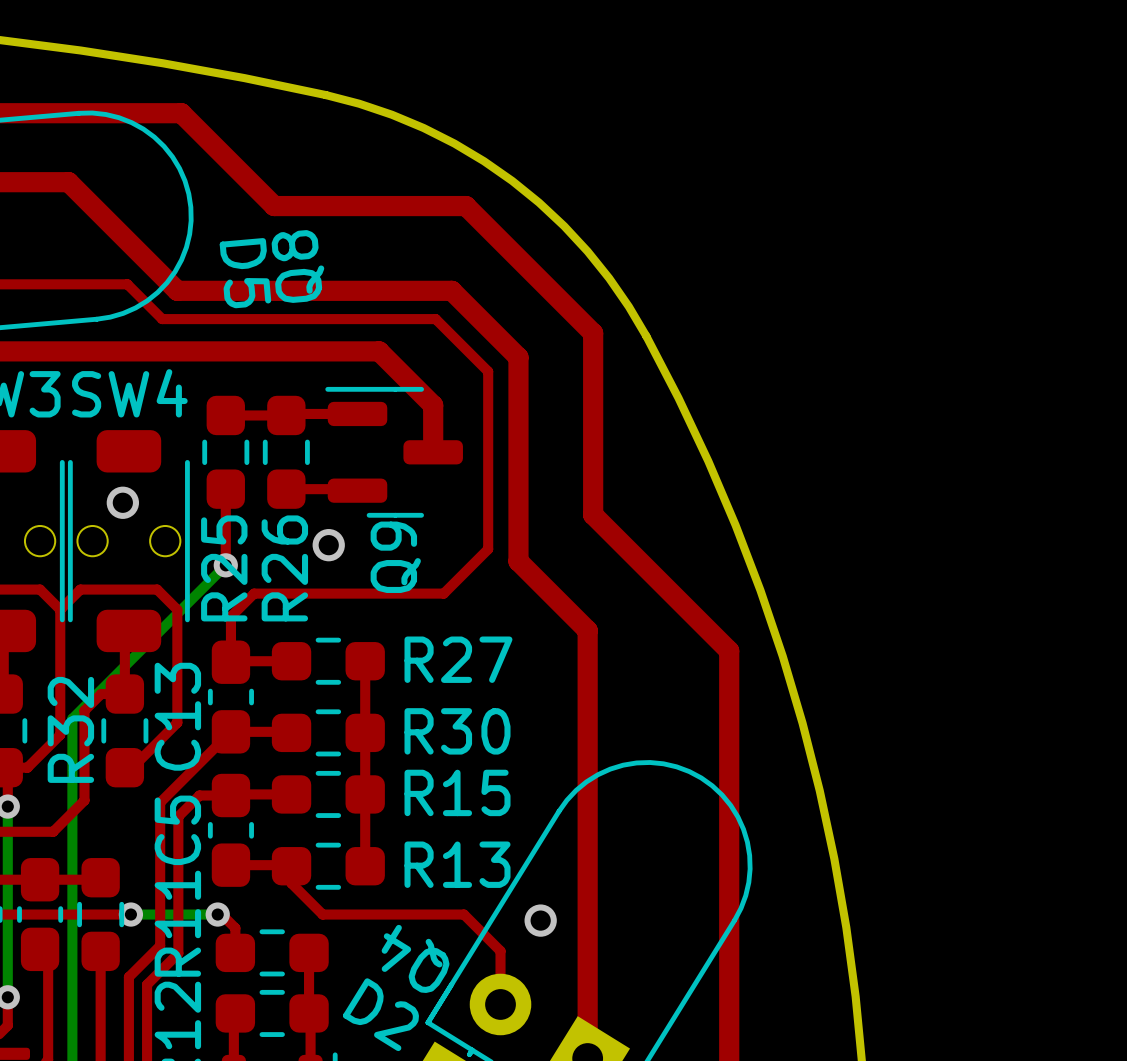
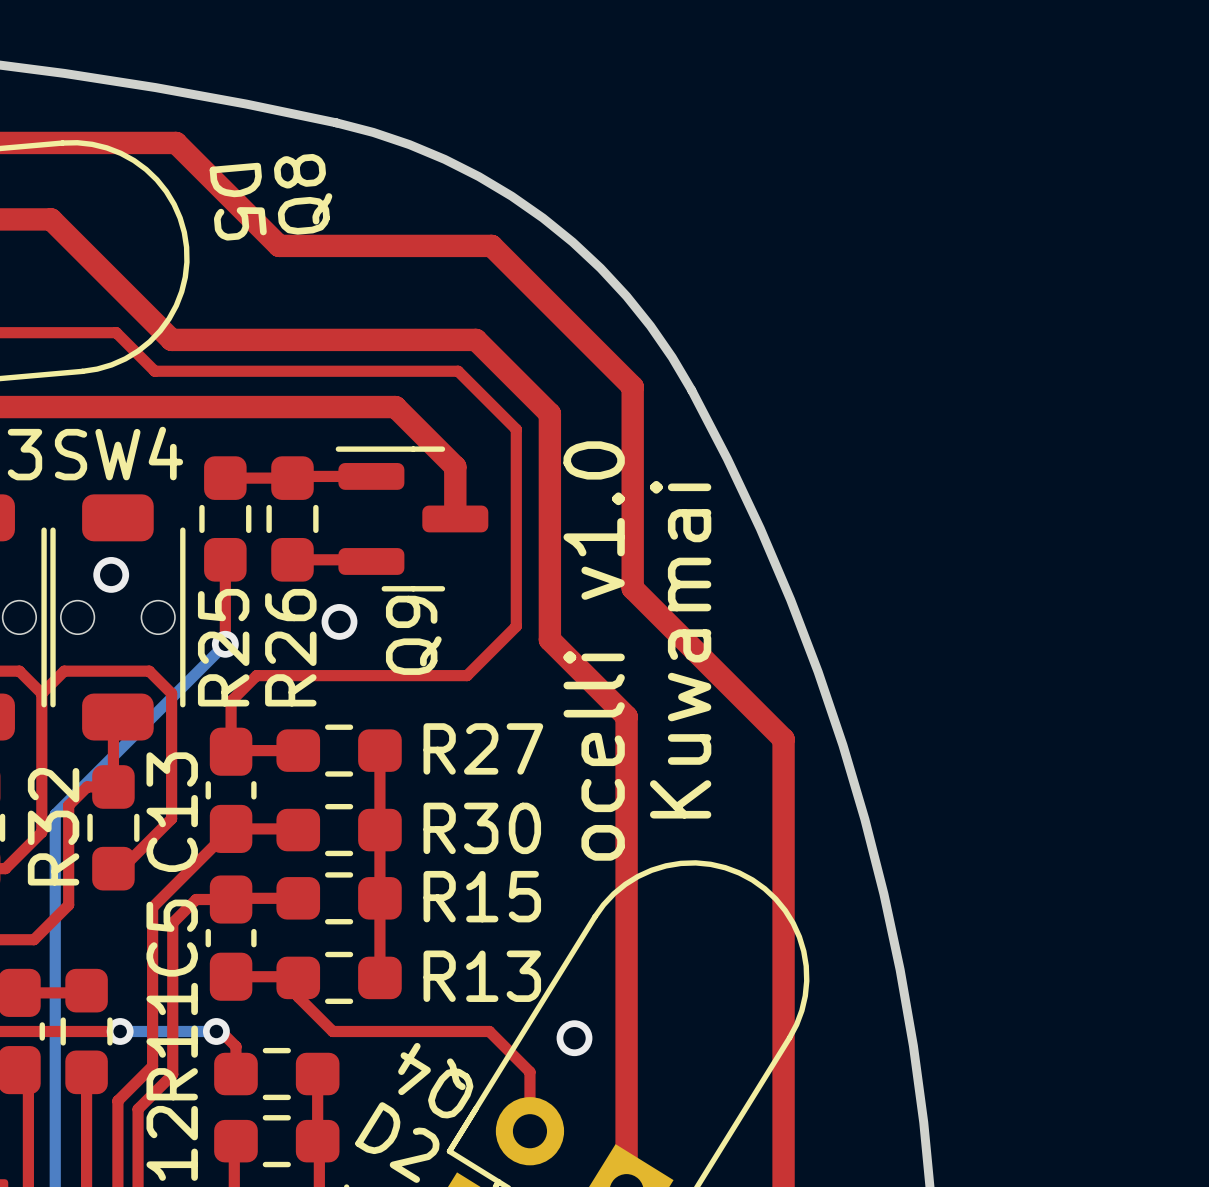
Q8 name position: Q8 (297, 266) -> Q8 (303, 194)
D5 name position: D5 (245, 273) -> D5 (238, 201)
text: none -> Kuwamai (680, 649)
text: none -> ocelli v1.0 (594, 651)

